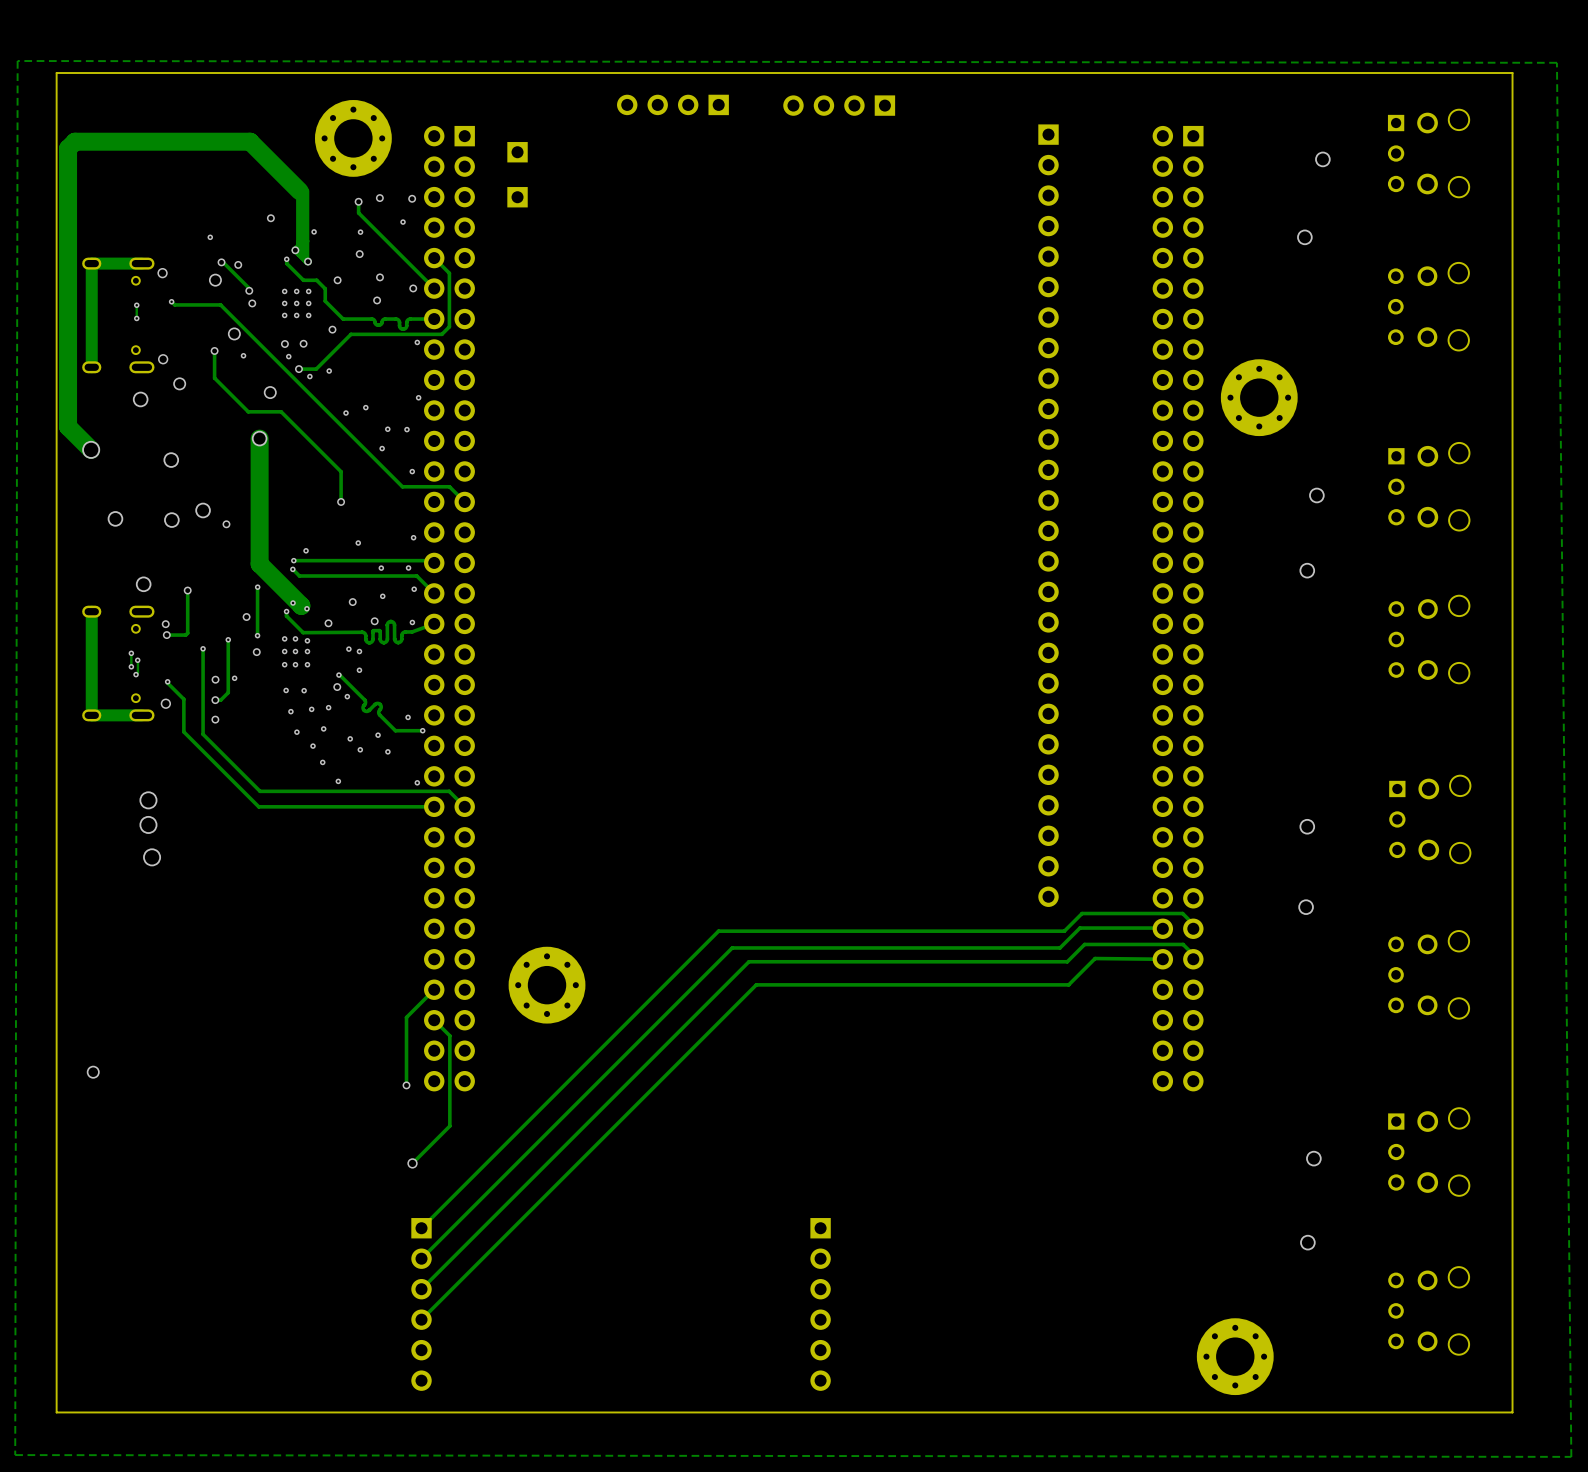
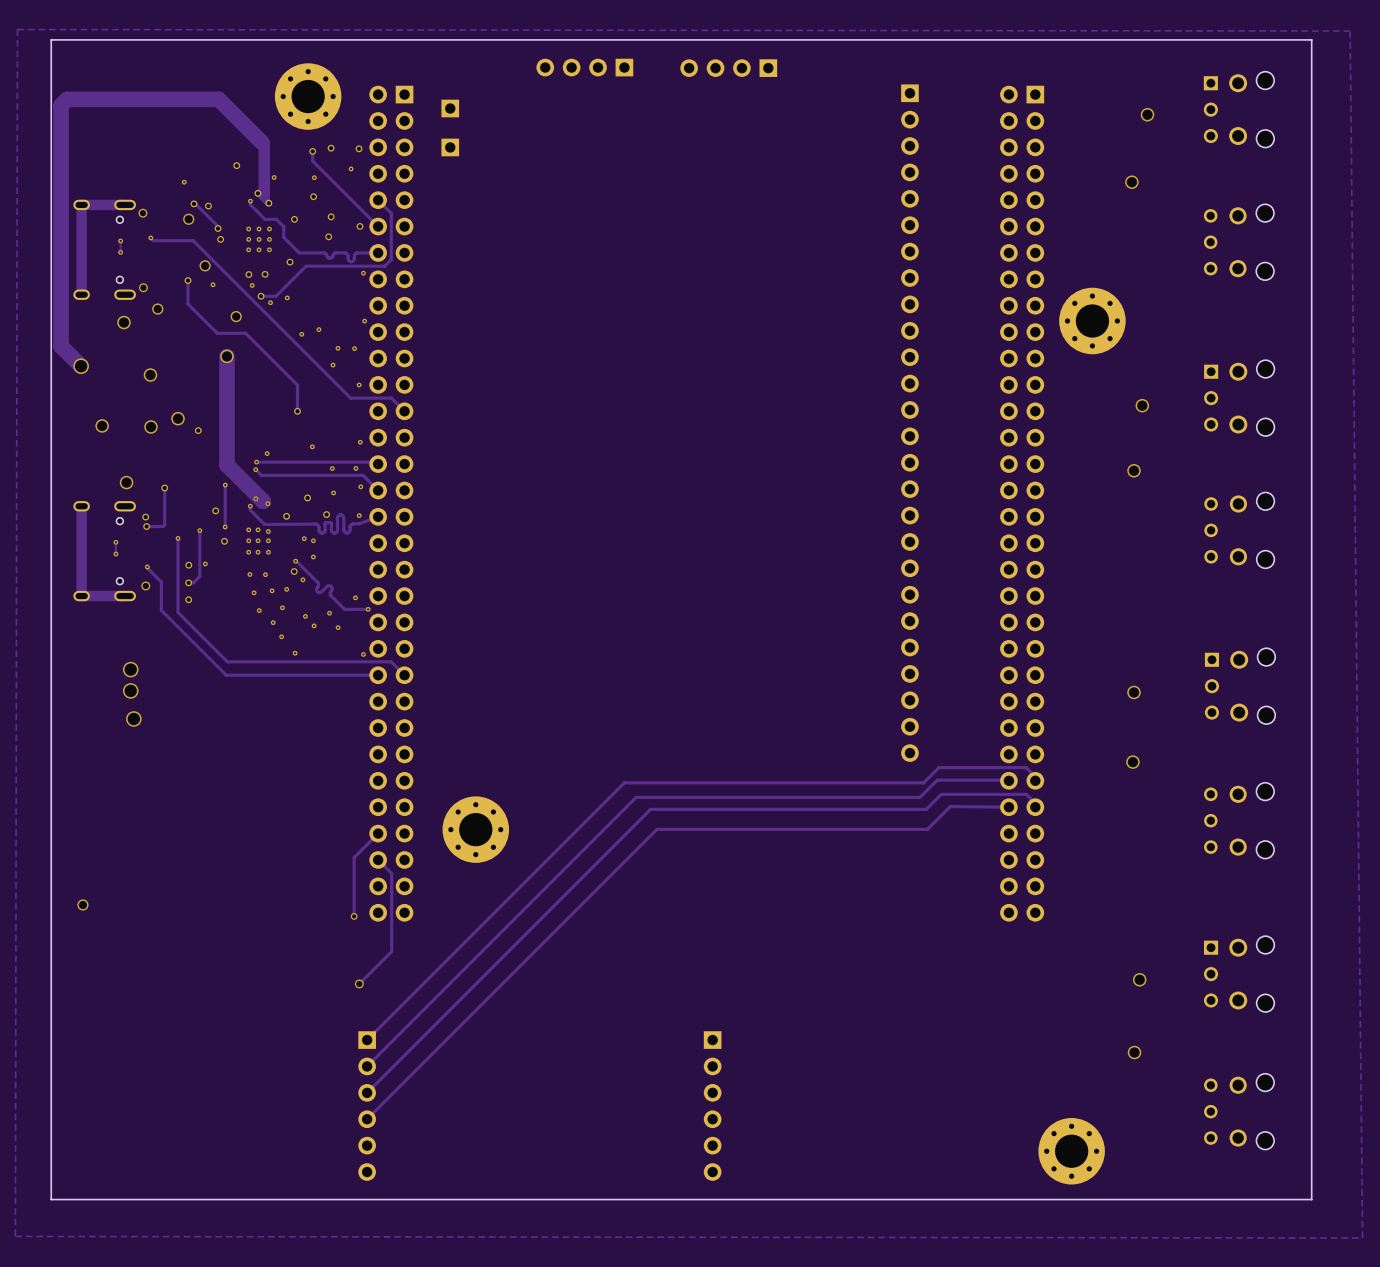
track: (137, 660) (137, 672) (136, 674) -> none
via: (137, 660) -> none
via: (136, 674) -> none

